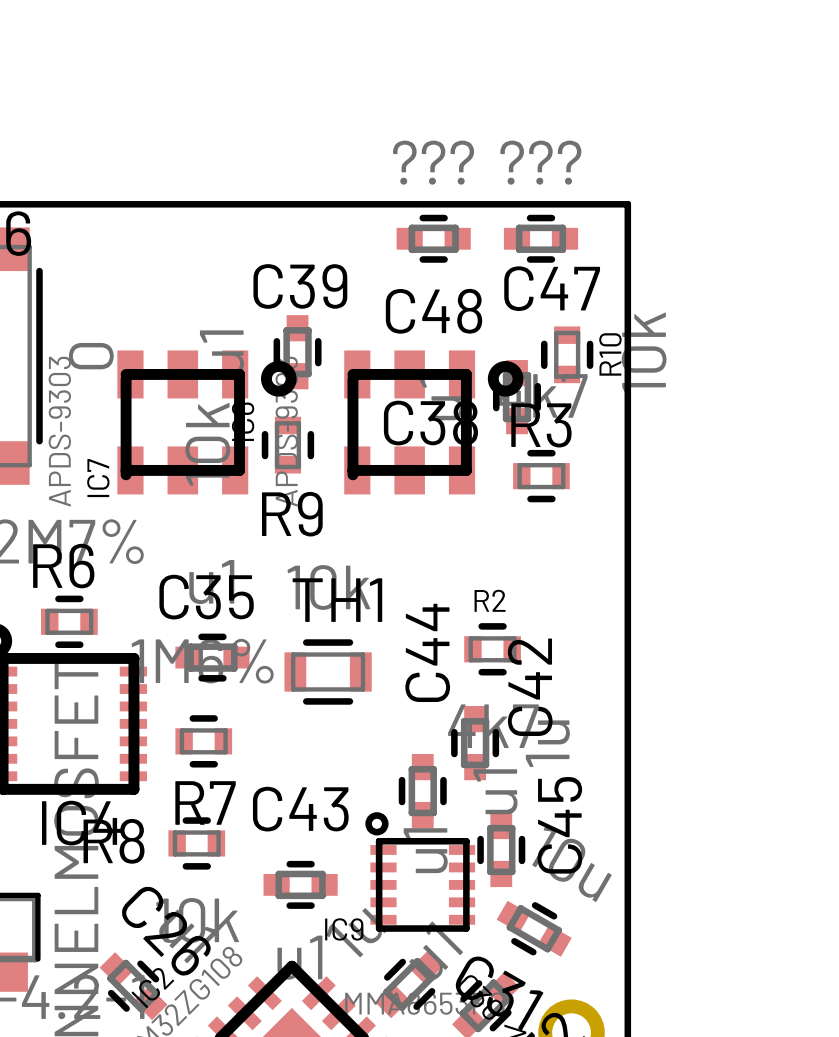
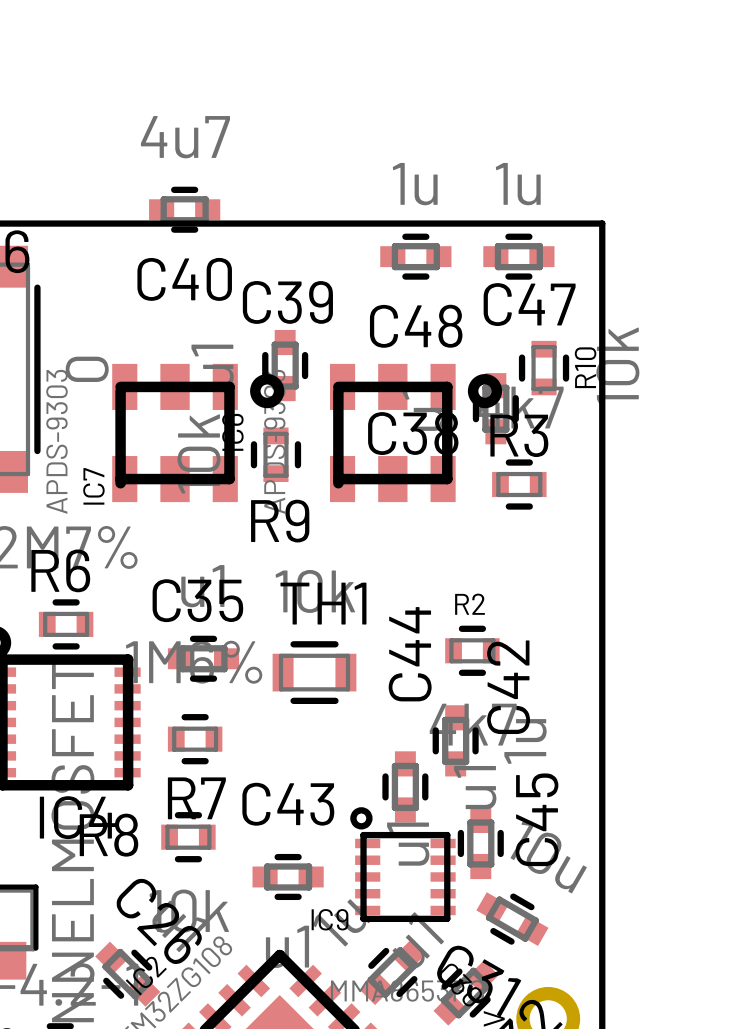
C48 value: ??? (433, 162) -> 1u (415, 184)
C47 value: ??? (540, 162) -> 1u (518, 184)
C40: none -> 4u7 (184, 209)

